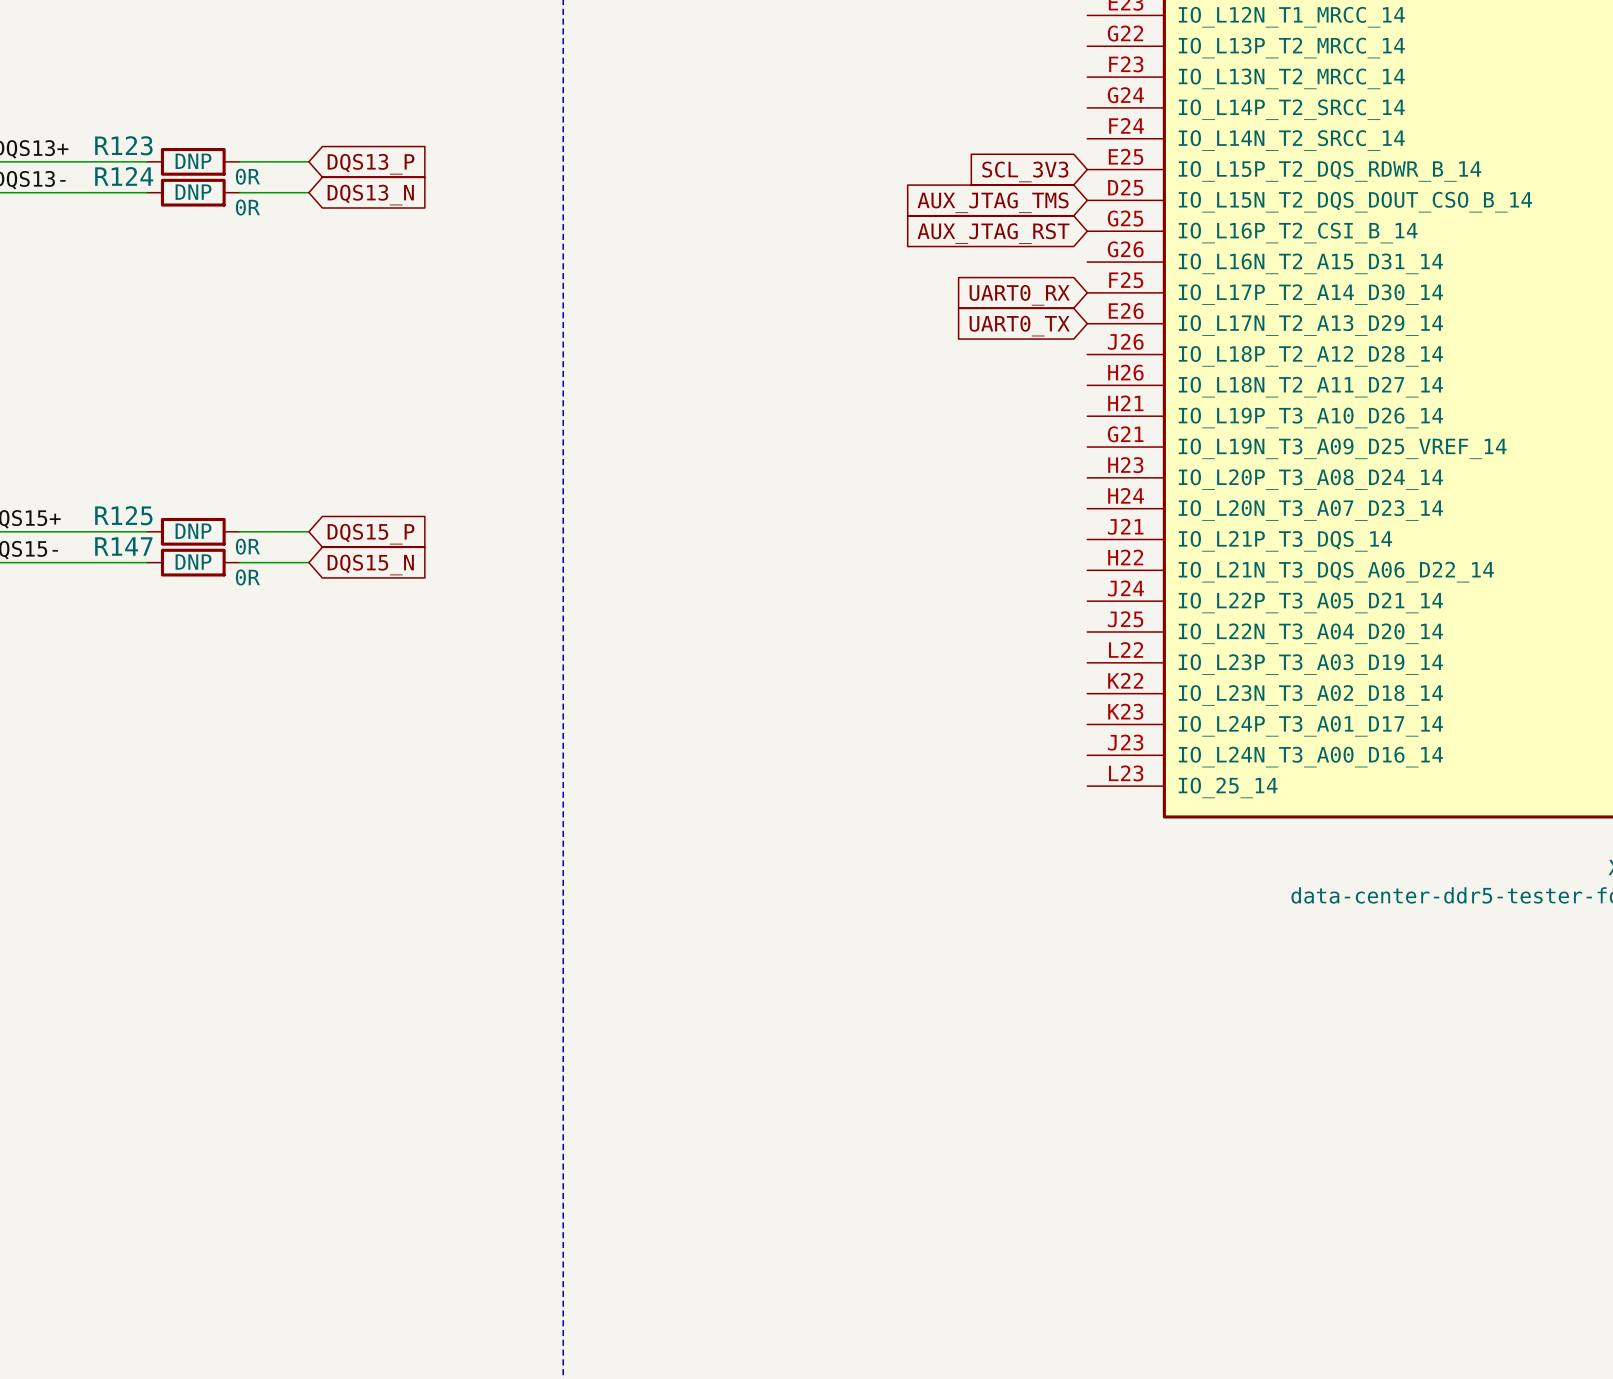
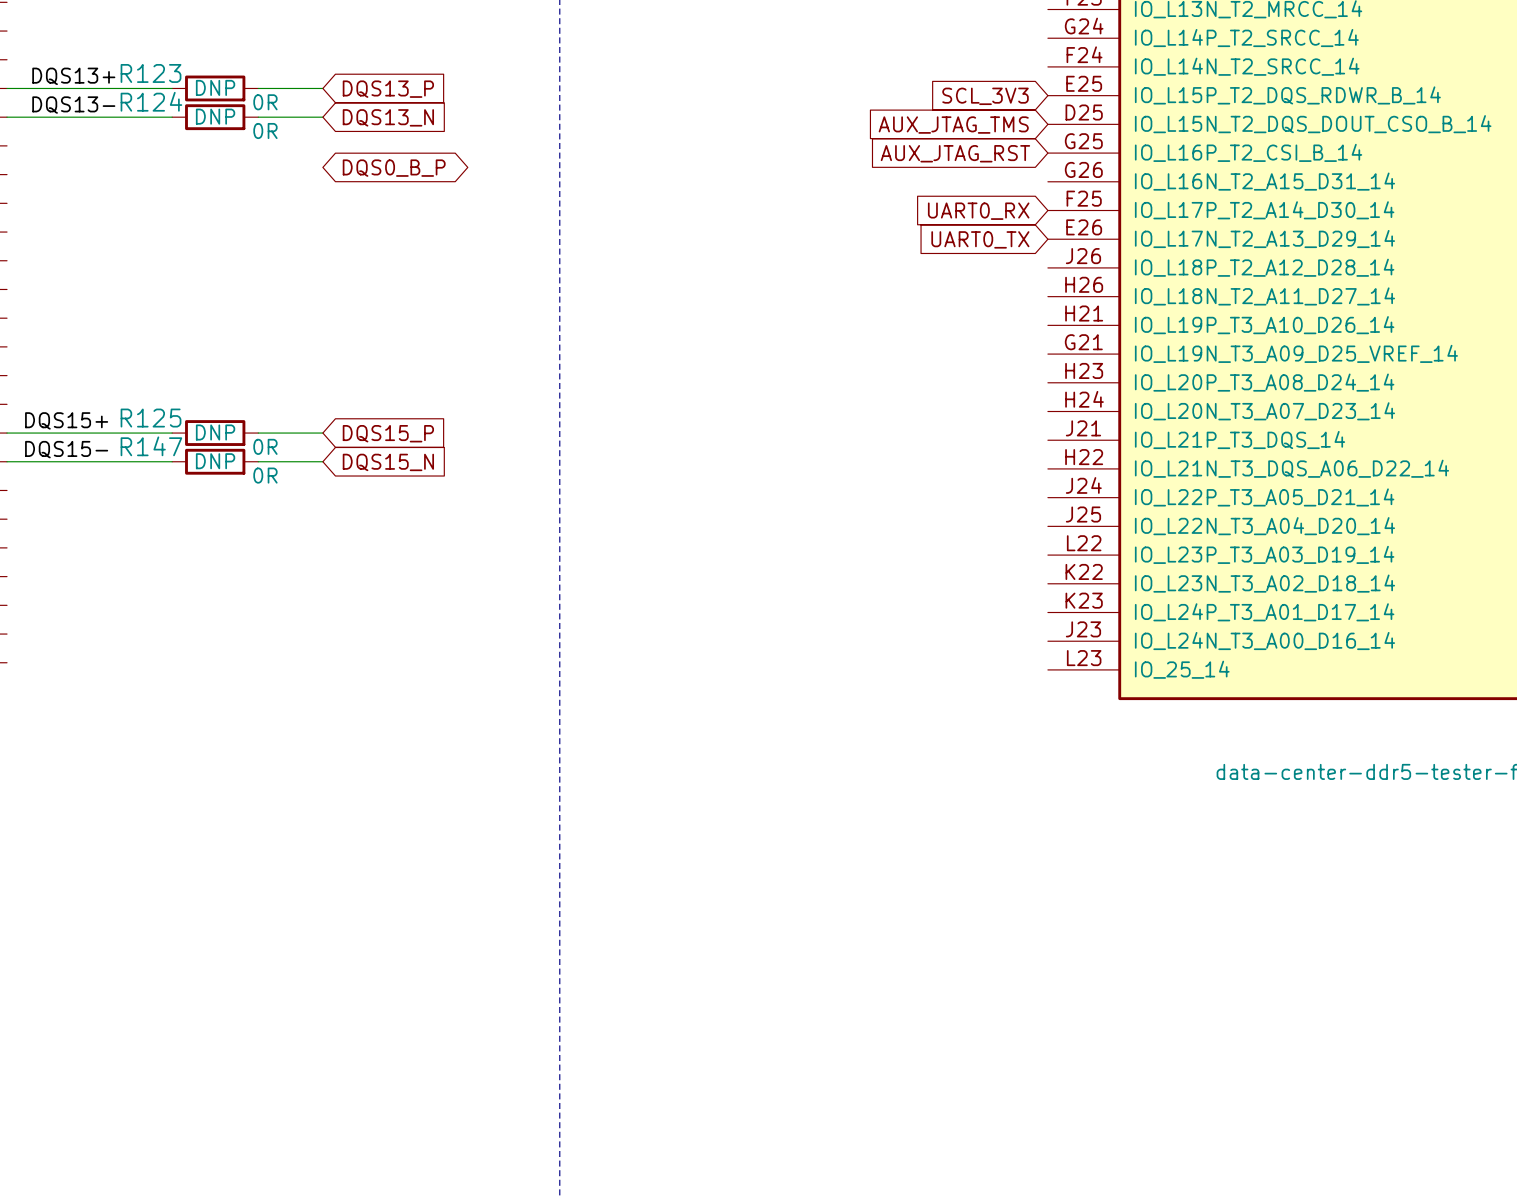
global label: none -> DQS0_B_P (394, 168)

